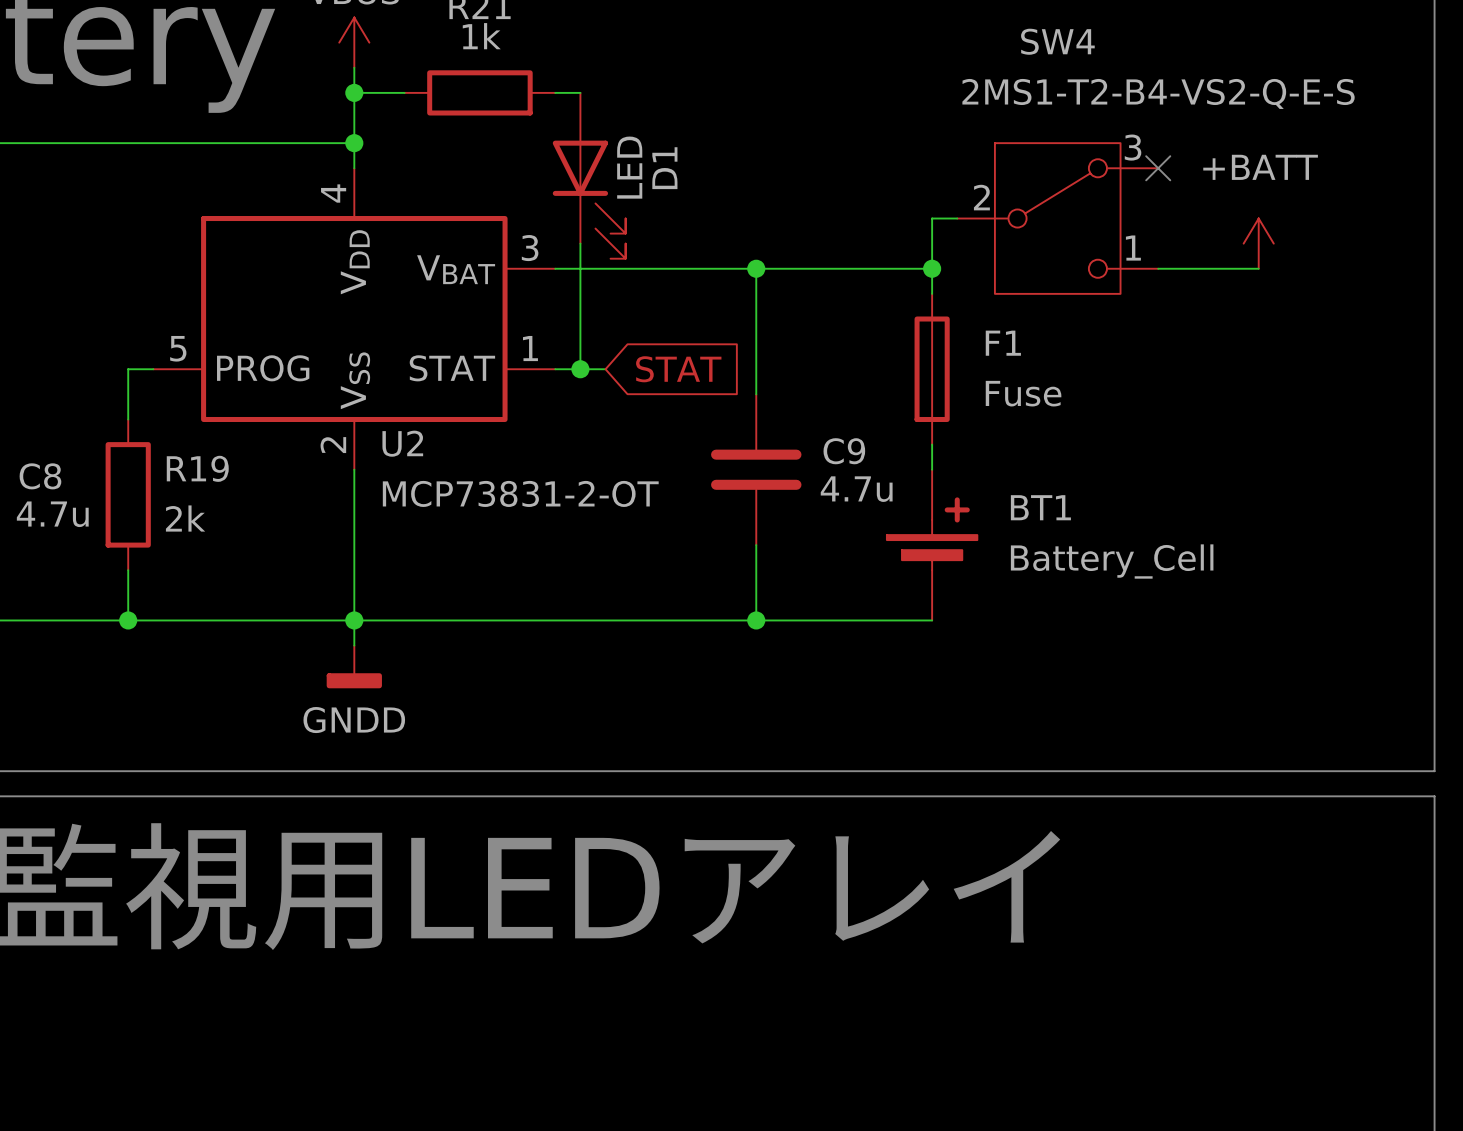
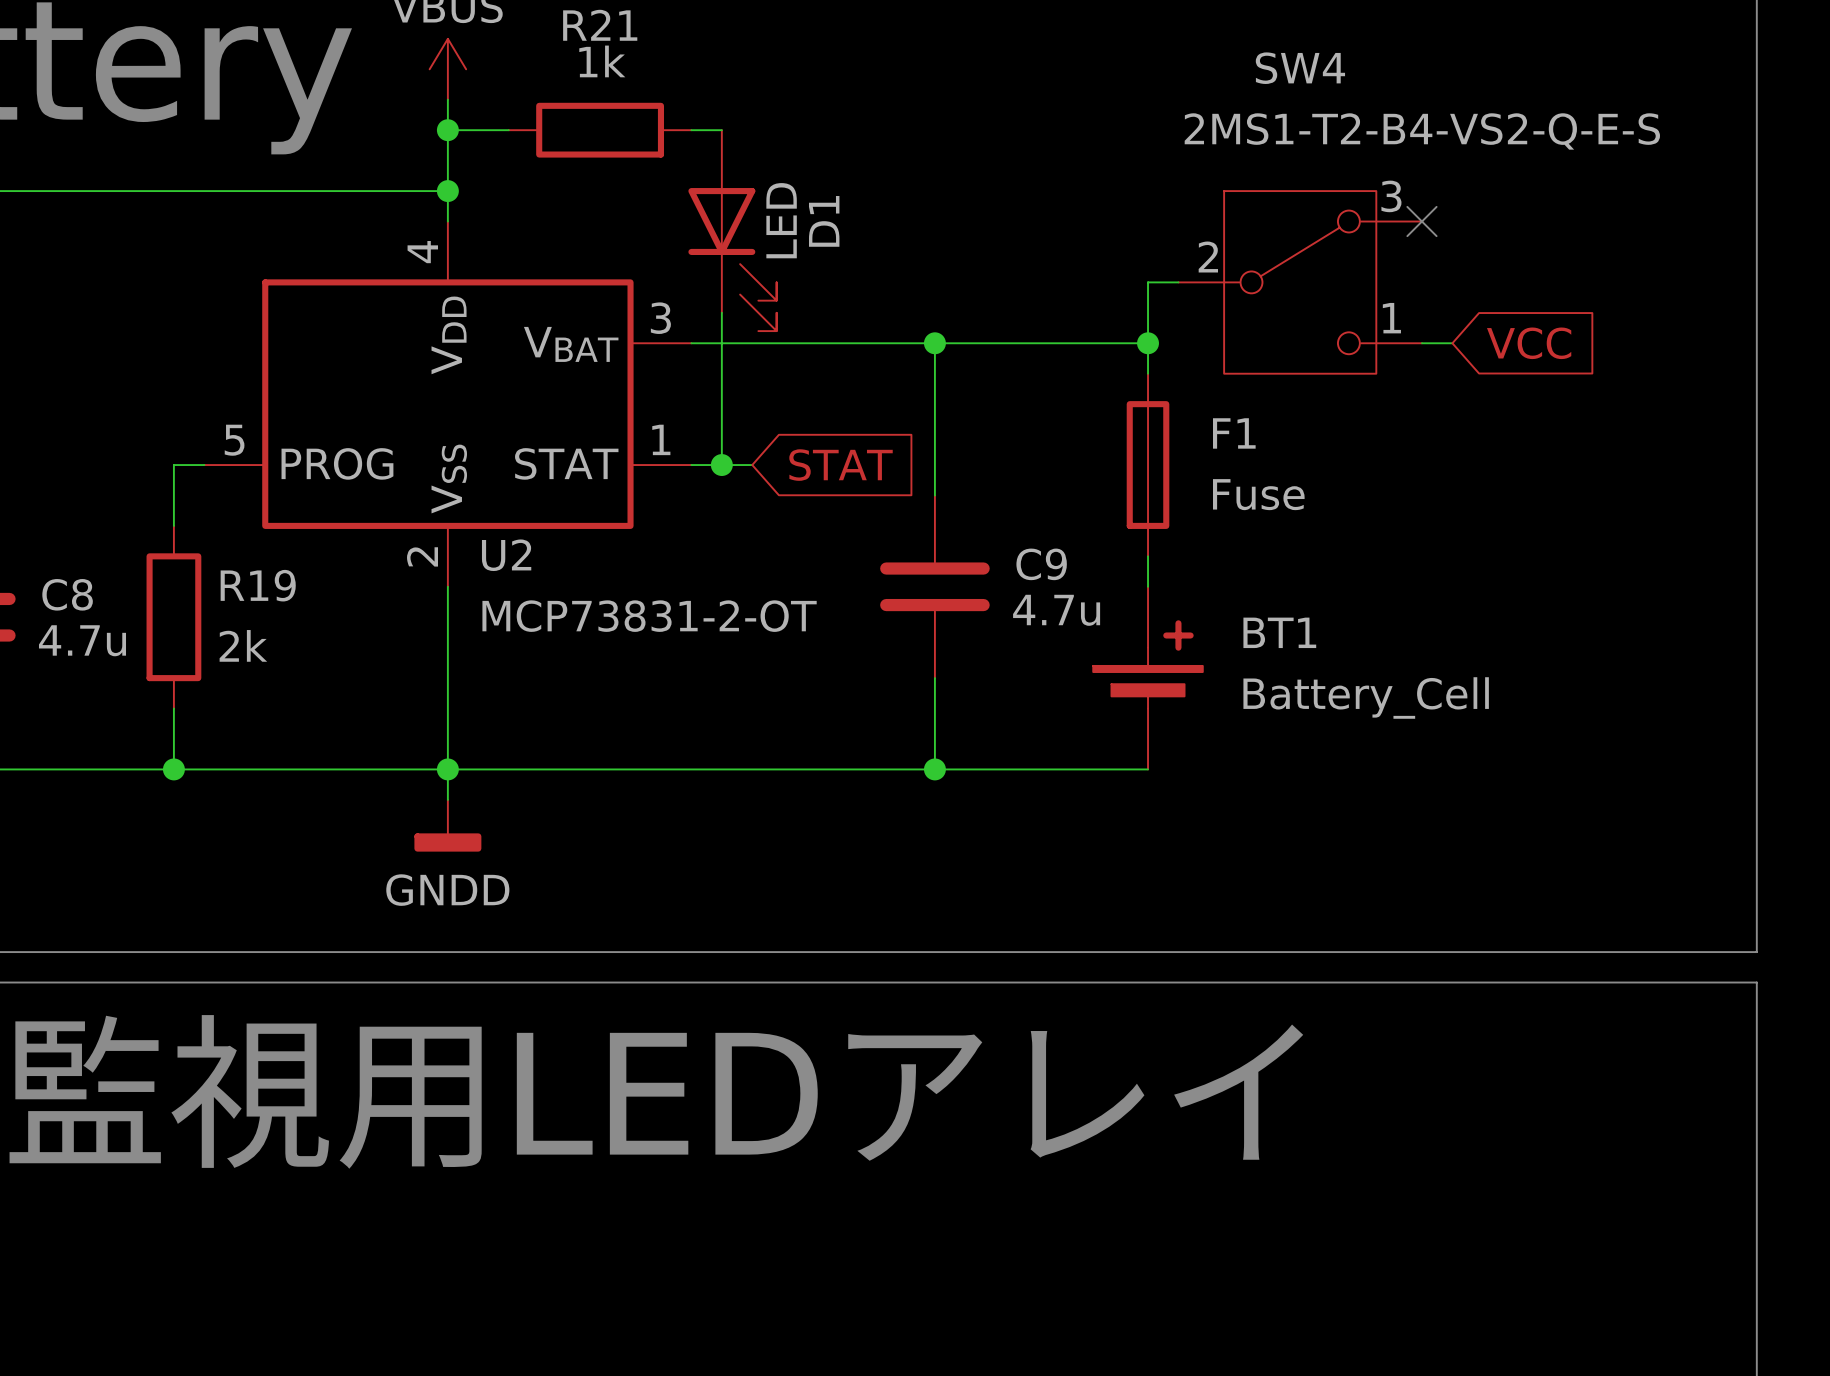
power symbol: +BATT (1258, 243) -> none
wire: (1183, 268) (1258, 268) -> none
global label: none -> VCC (1529, 343)

